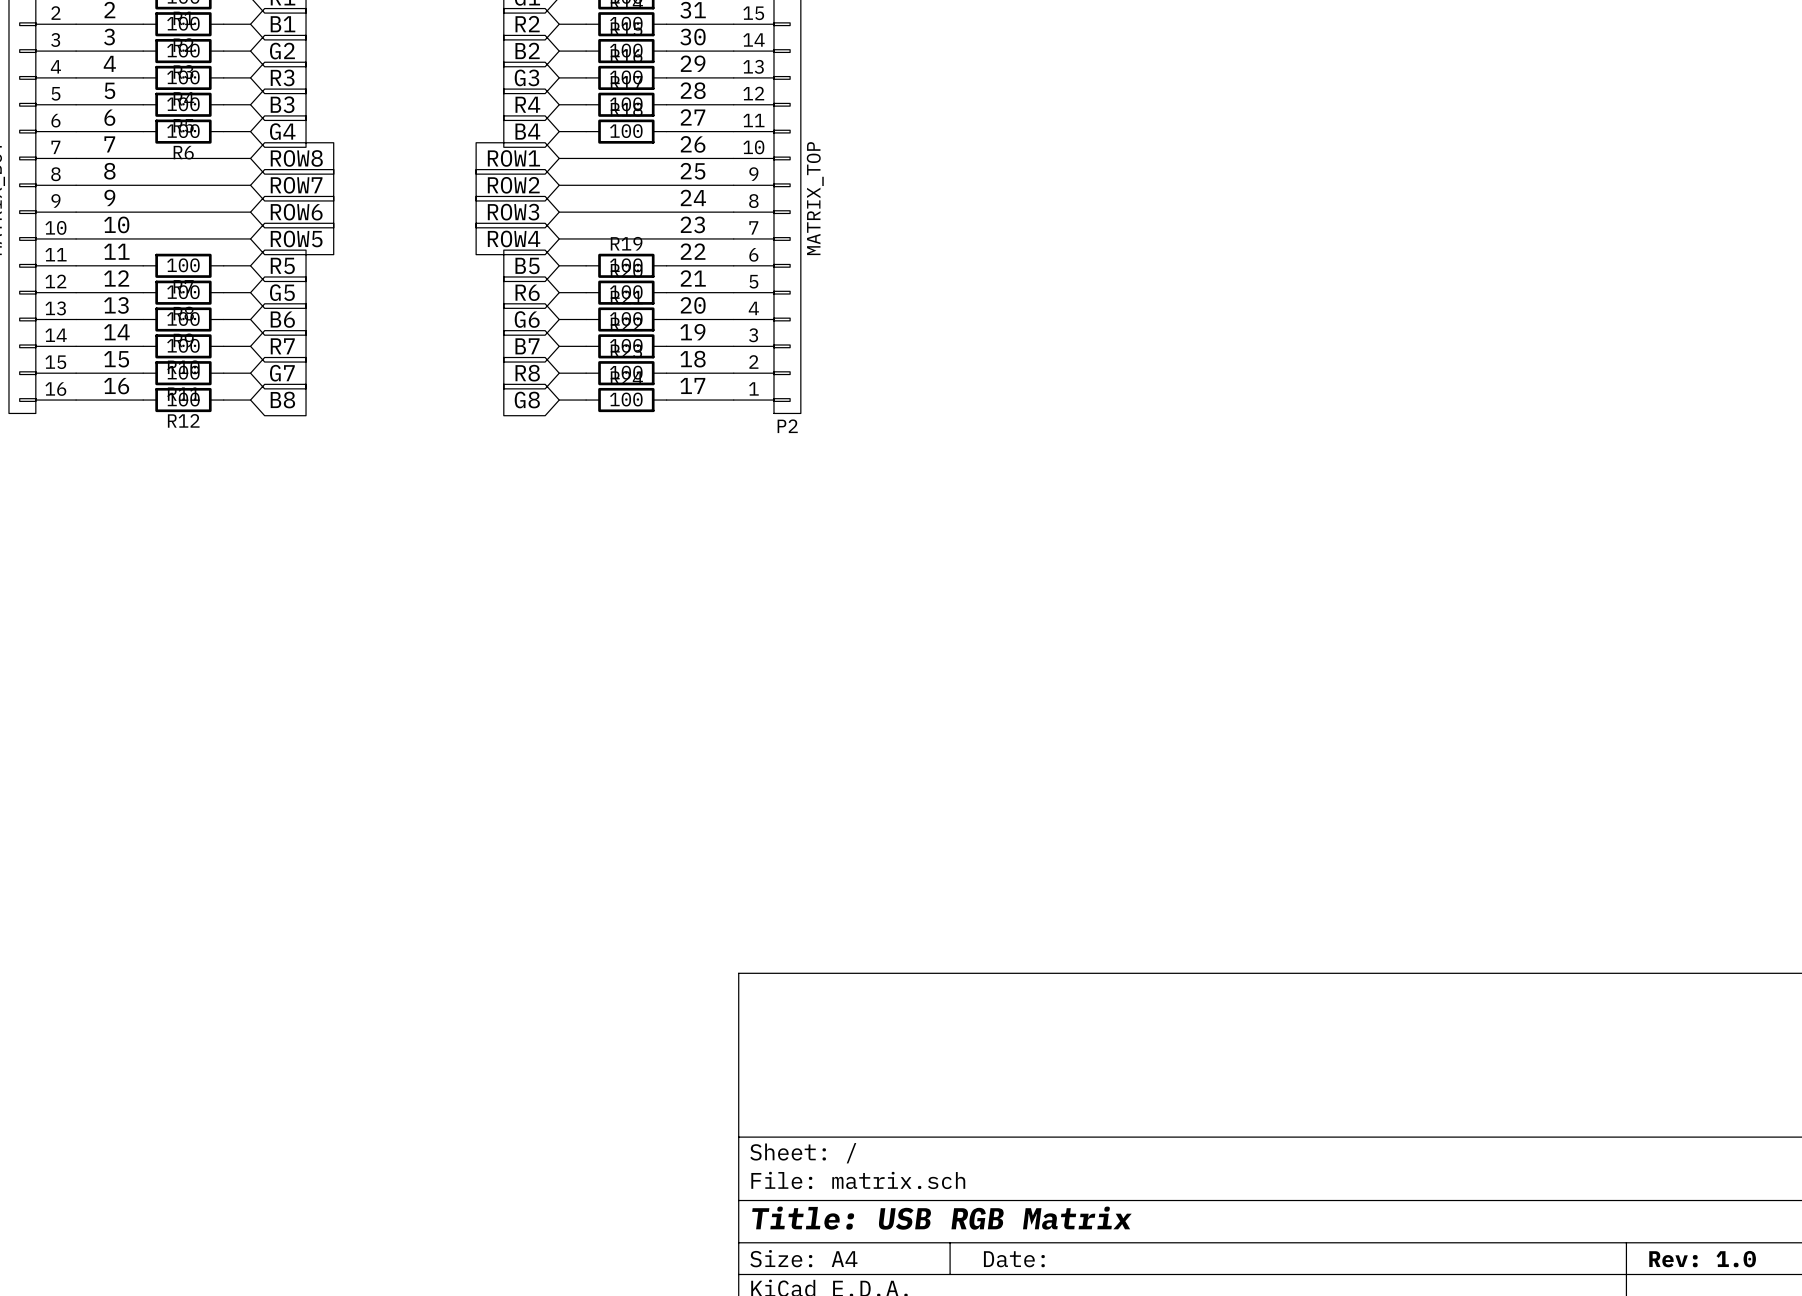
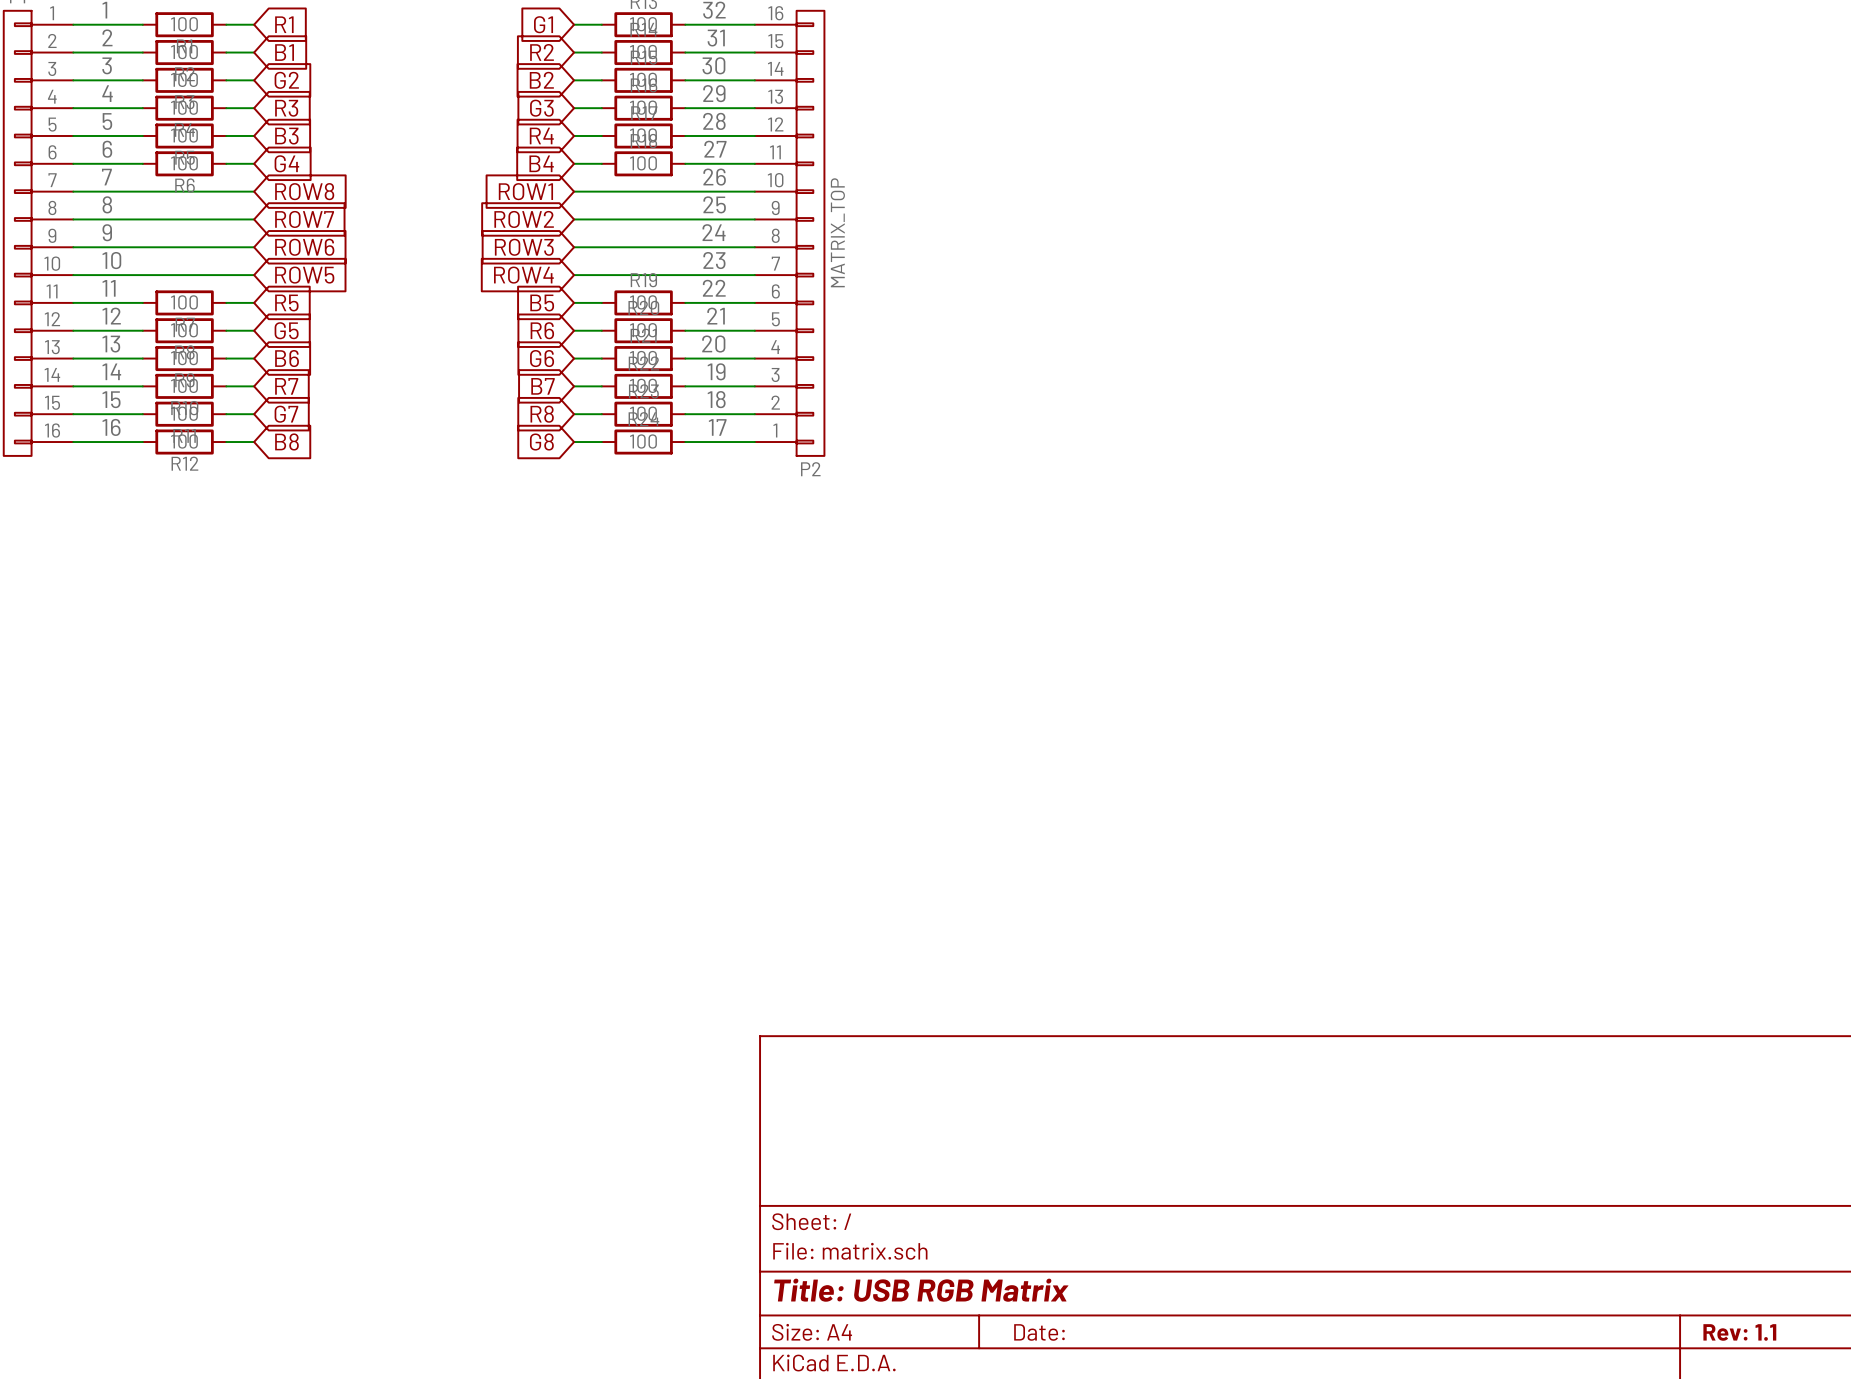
title block: Rev: 1.0 (1702, 1259) -> Rev: 1.1 (1739, 1332)

